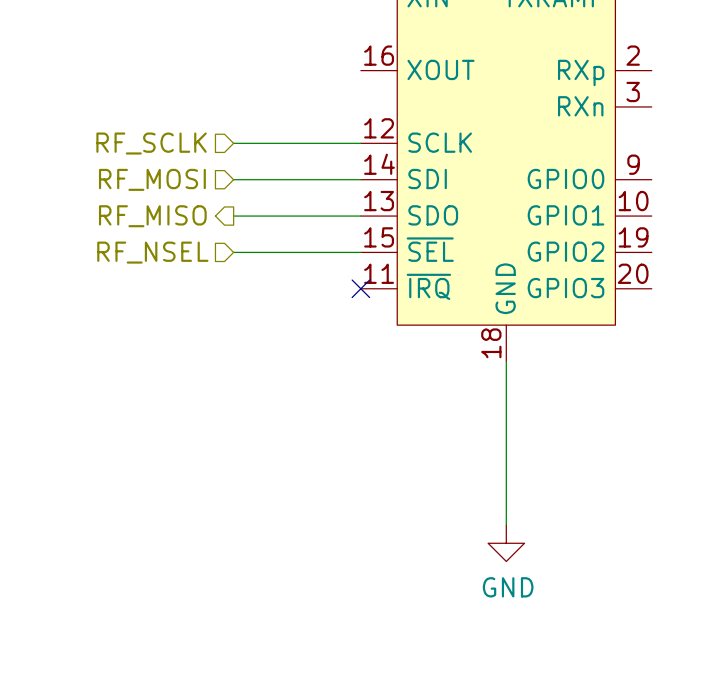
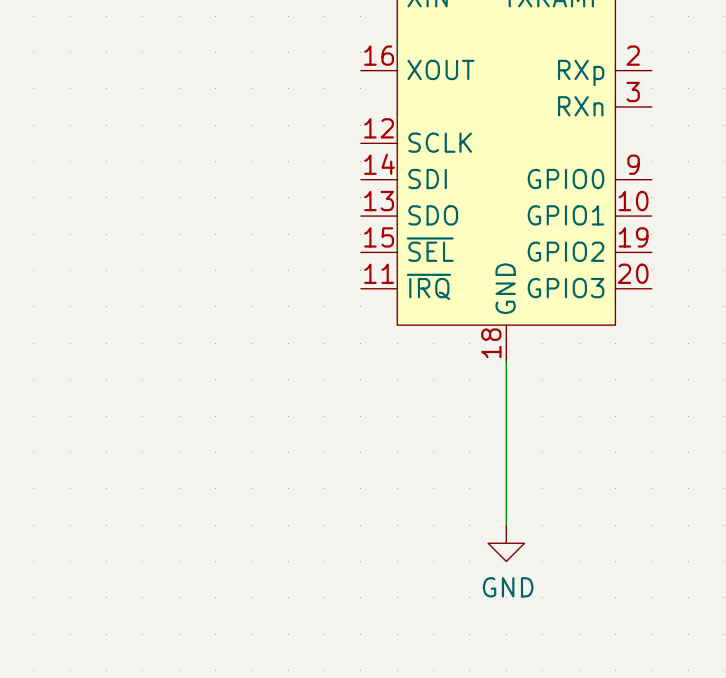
hierarchical label: RF_SCLK (151, 143) -> none
wire: (233, 143) (360, 143) -> none
hierarchical label: RF_MOSI (152, 179) -> none
wire: (233, 179) (360, 179) -> none
hierarchical label: RF_MISO (152, 216) -> none
wire: (233, 216) (360, 216) -> none
hierarchical label: RF_NSEL (152, 252) -> none
wire: (233, 252) (360, 252) -> none
no-connect mark: (360, 288) -> none

